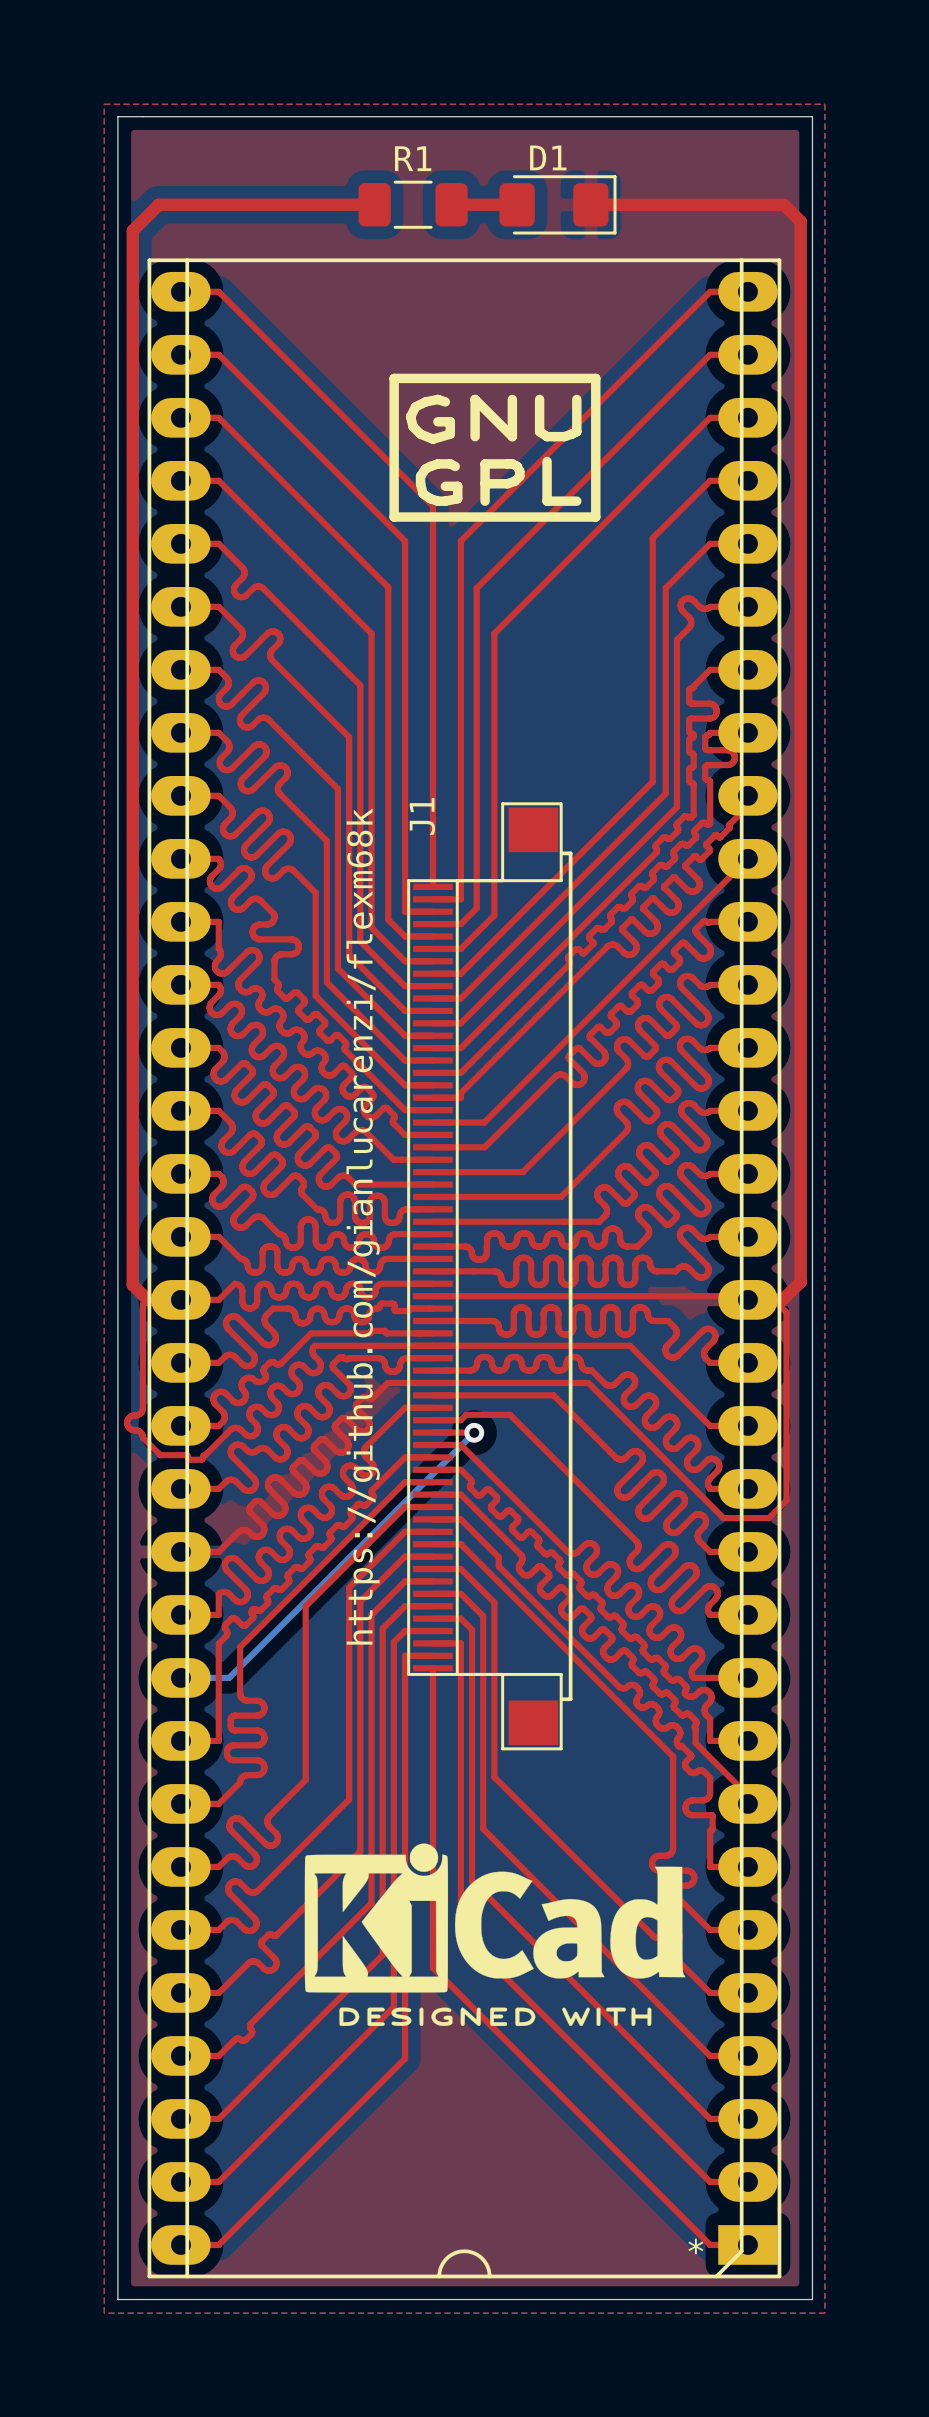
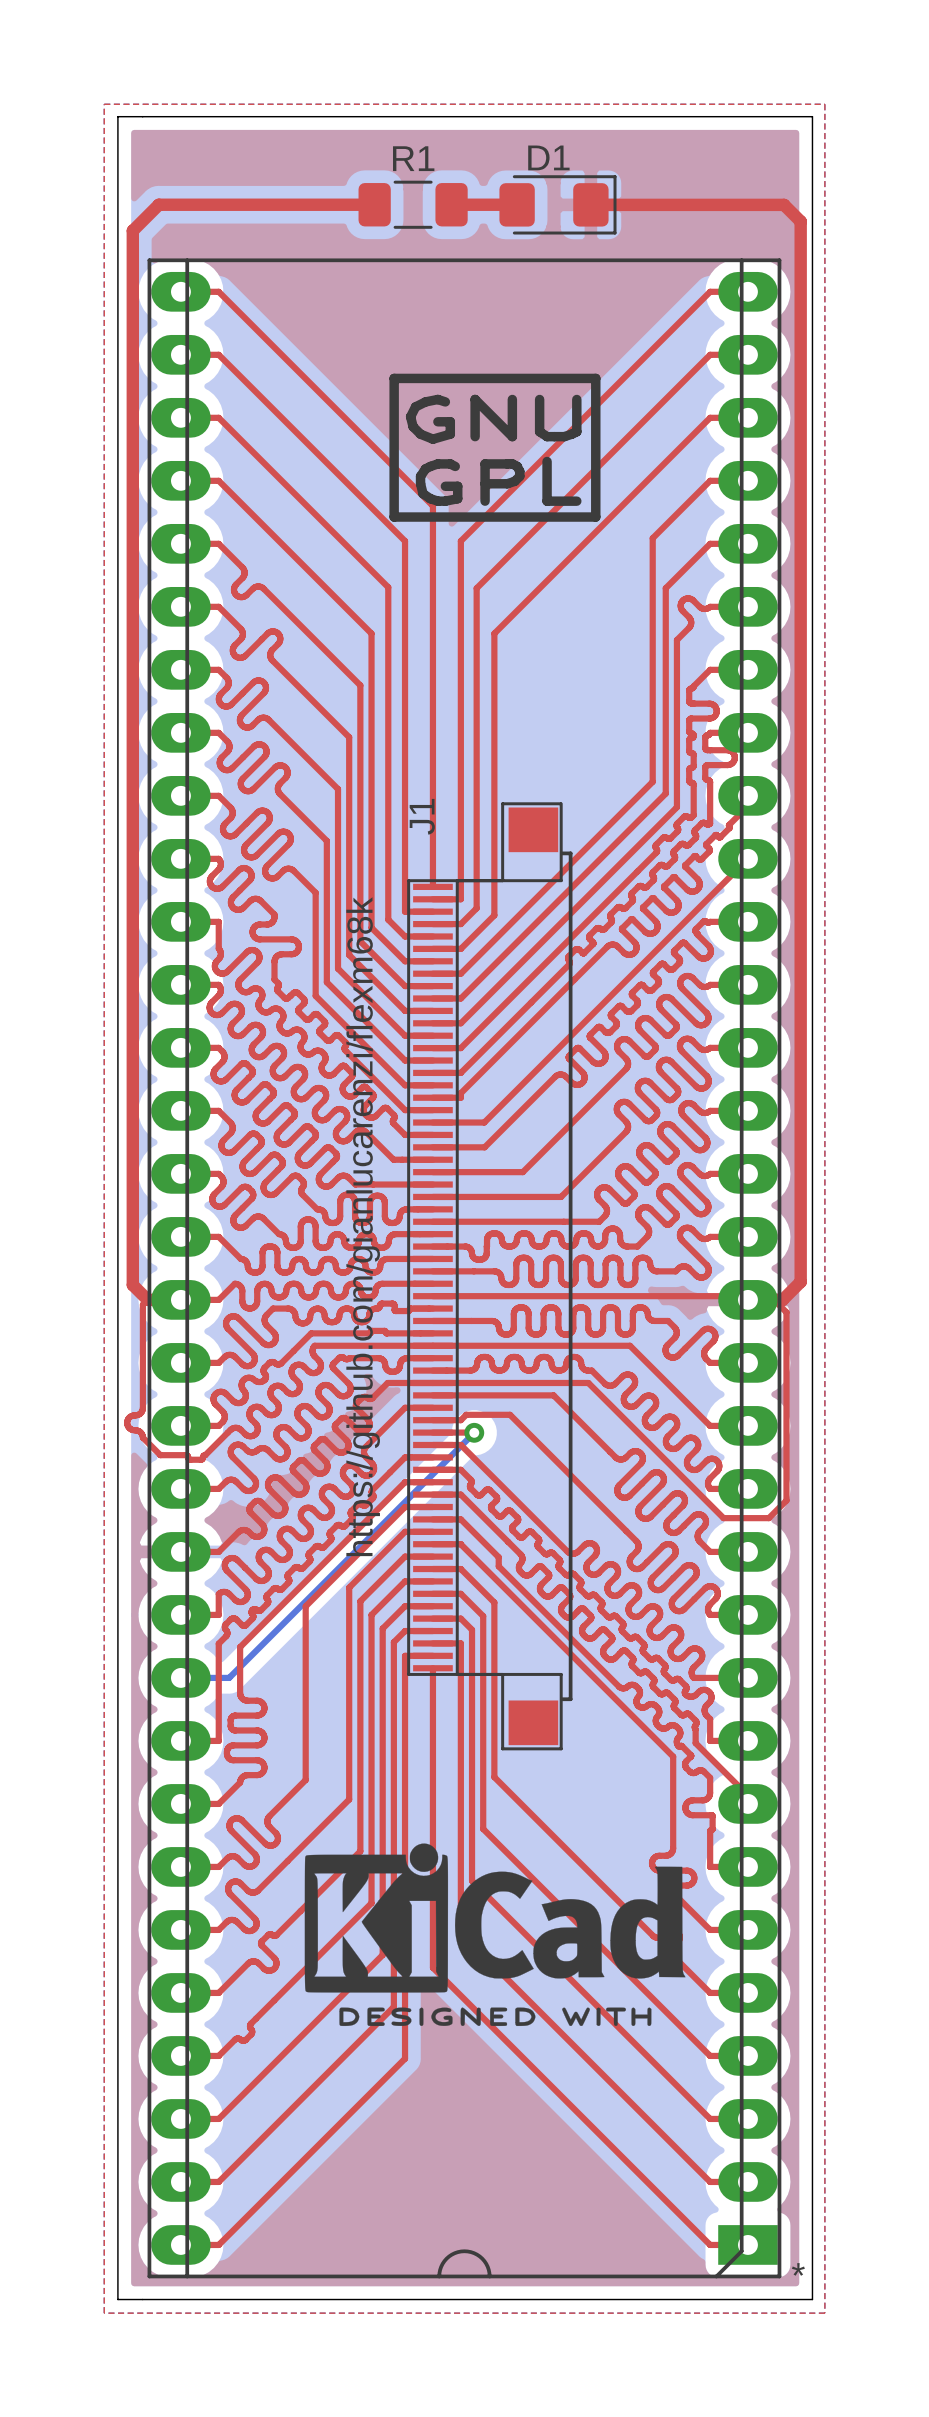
part text position: * (695, 2246) -> * (798, 2269)

